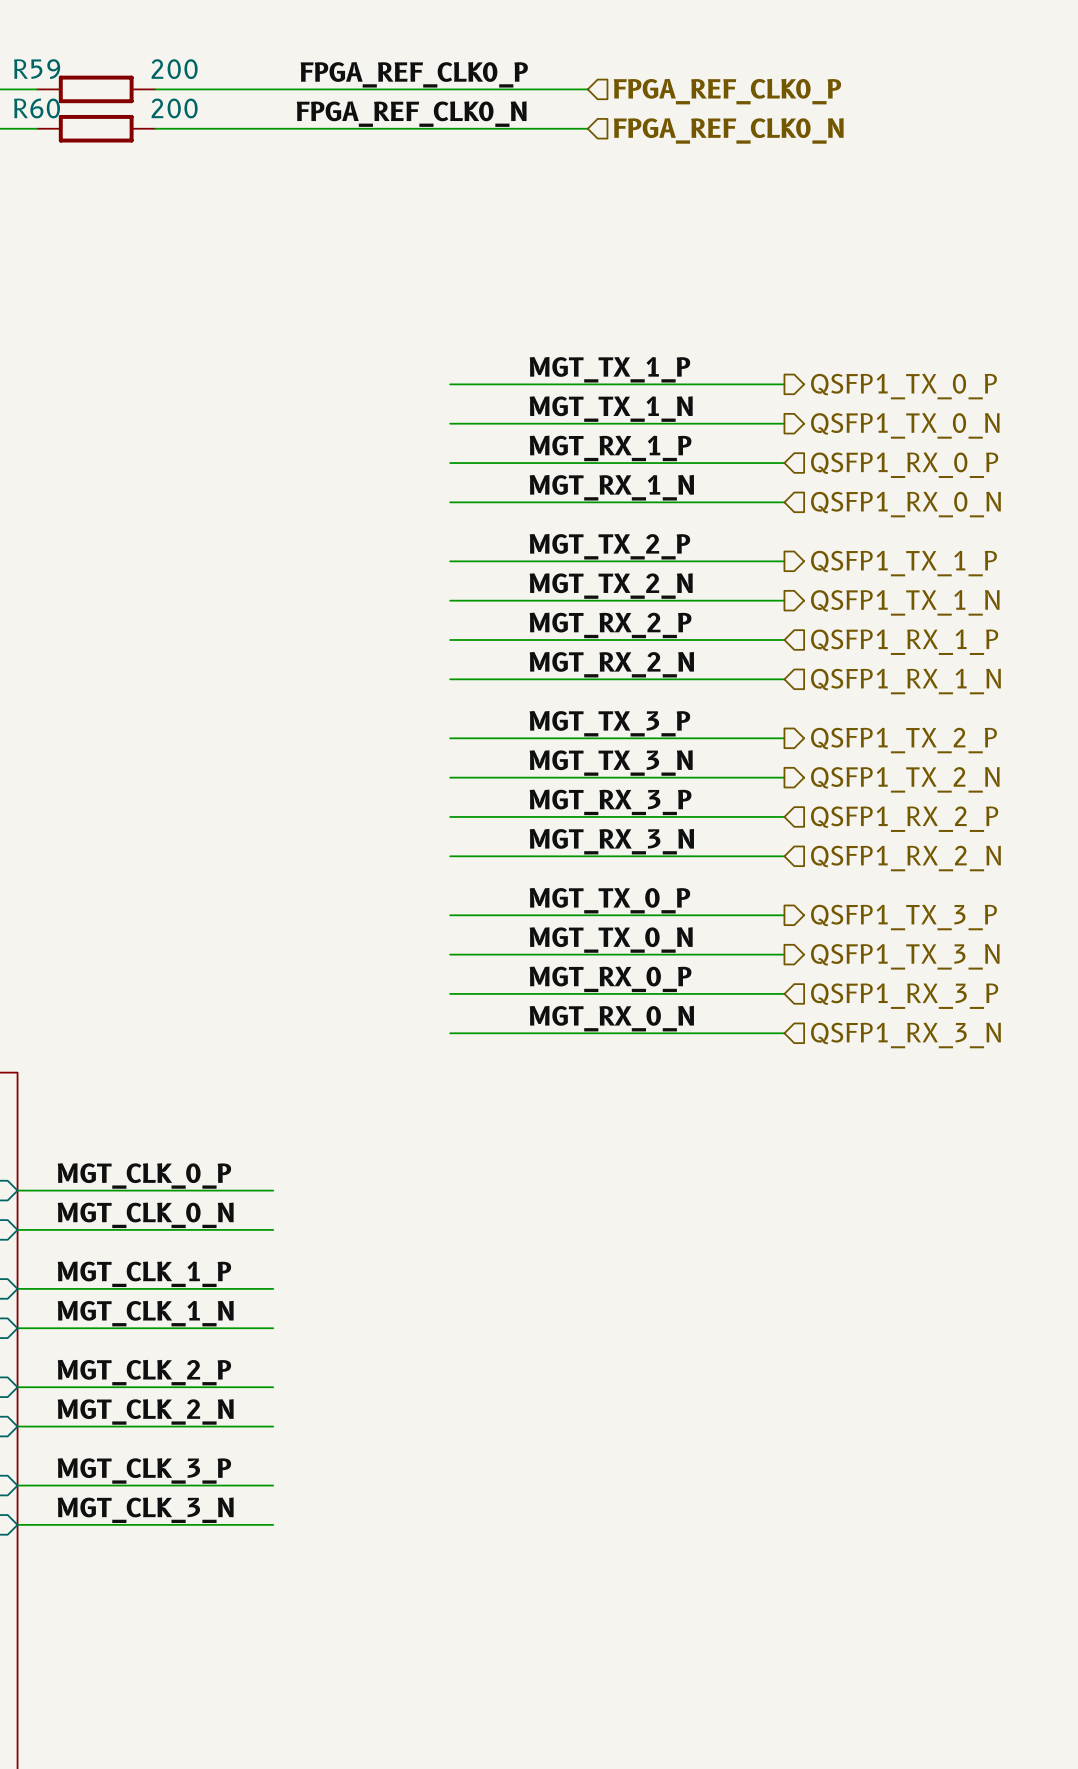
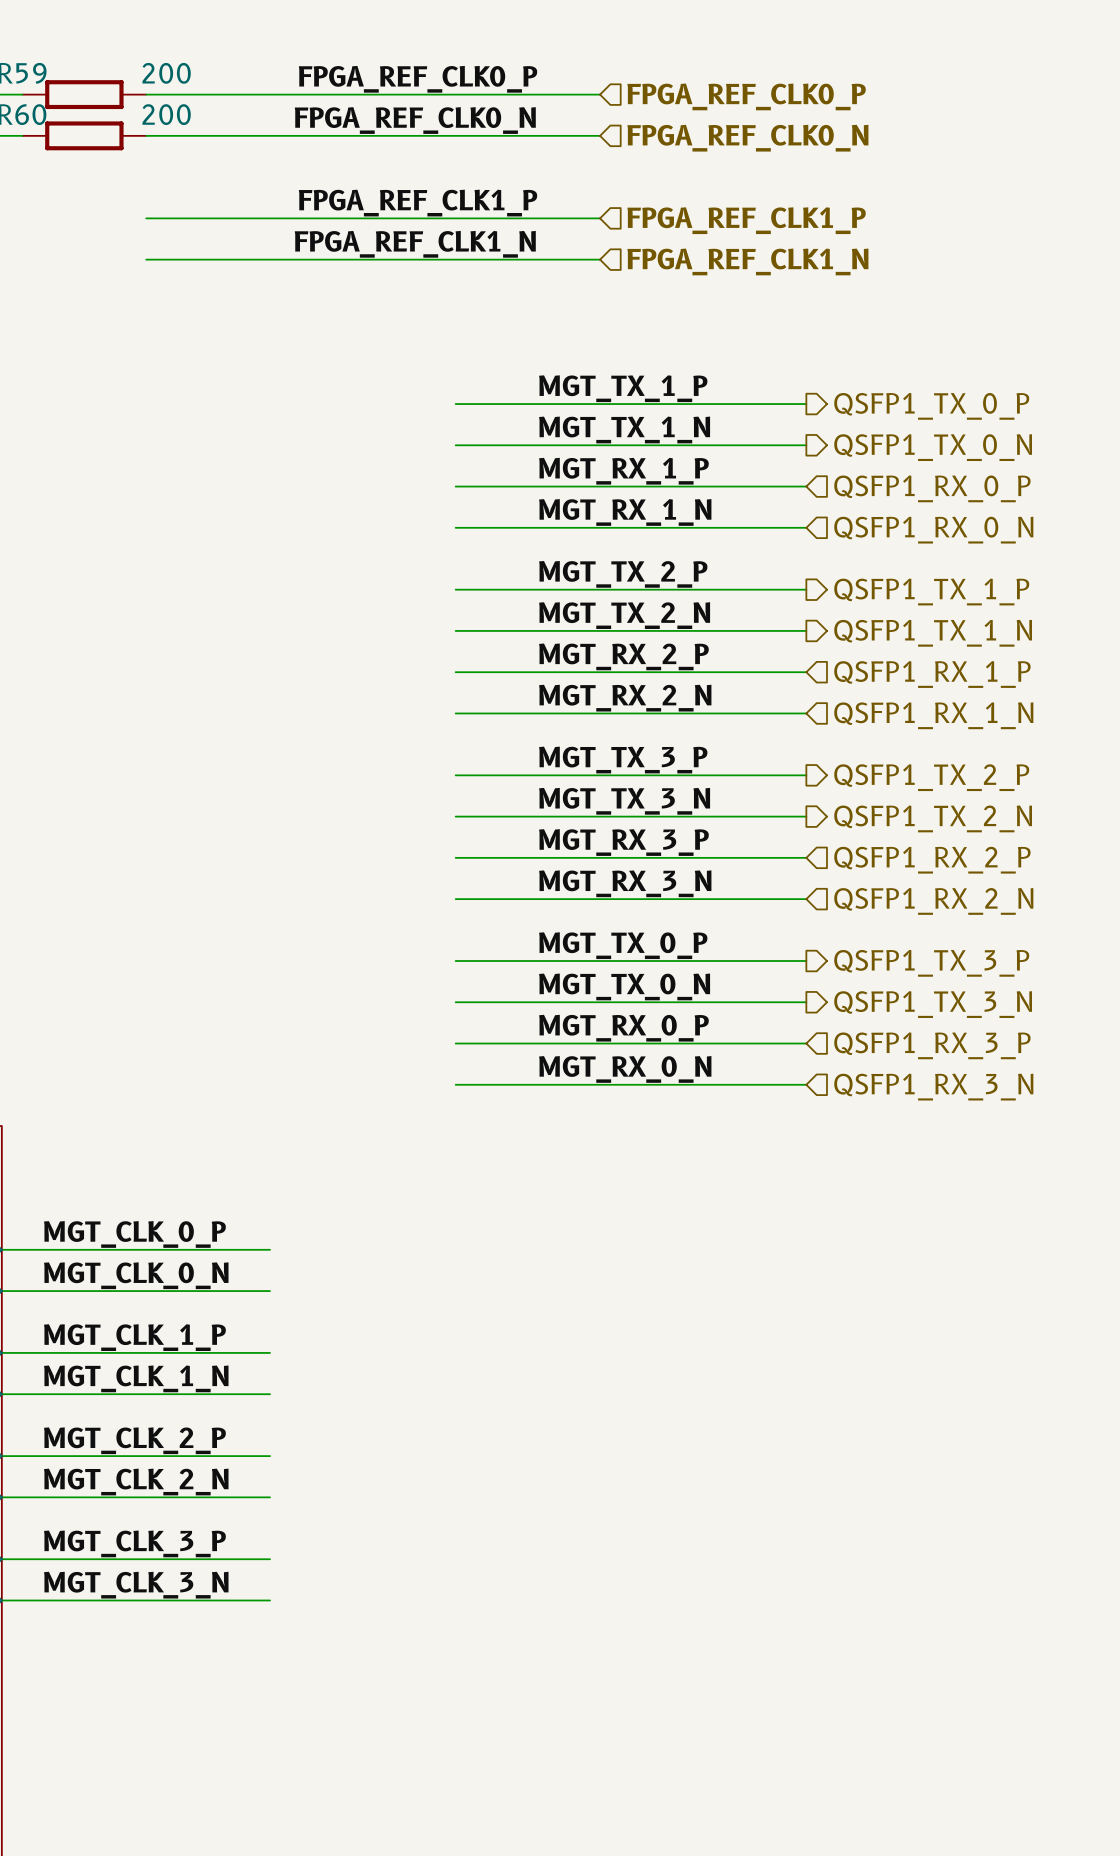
label: none -> FPGA_REF_CLK1_P (418, 203)
wire: none -> (146, 218) (600, 218)
hierarchical label: none -> FPGA_REF_CLK1_P (746, 220)
label: none -> FPGA_REF_CLK1_N (415, 244)
wire: none -> (146, 259) (600, 259)
hierarchical label: none -> FPGA_REF_CLK1_N (747, 261)

